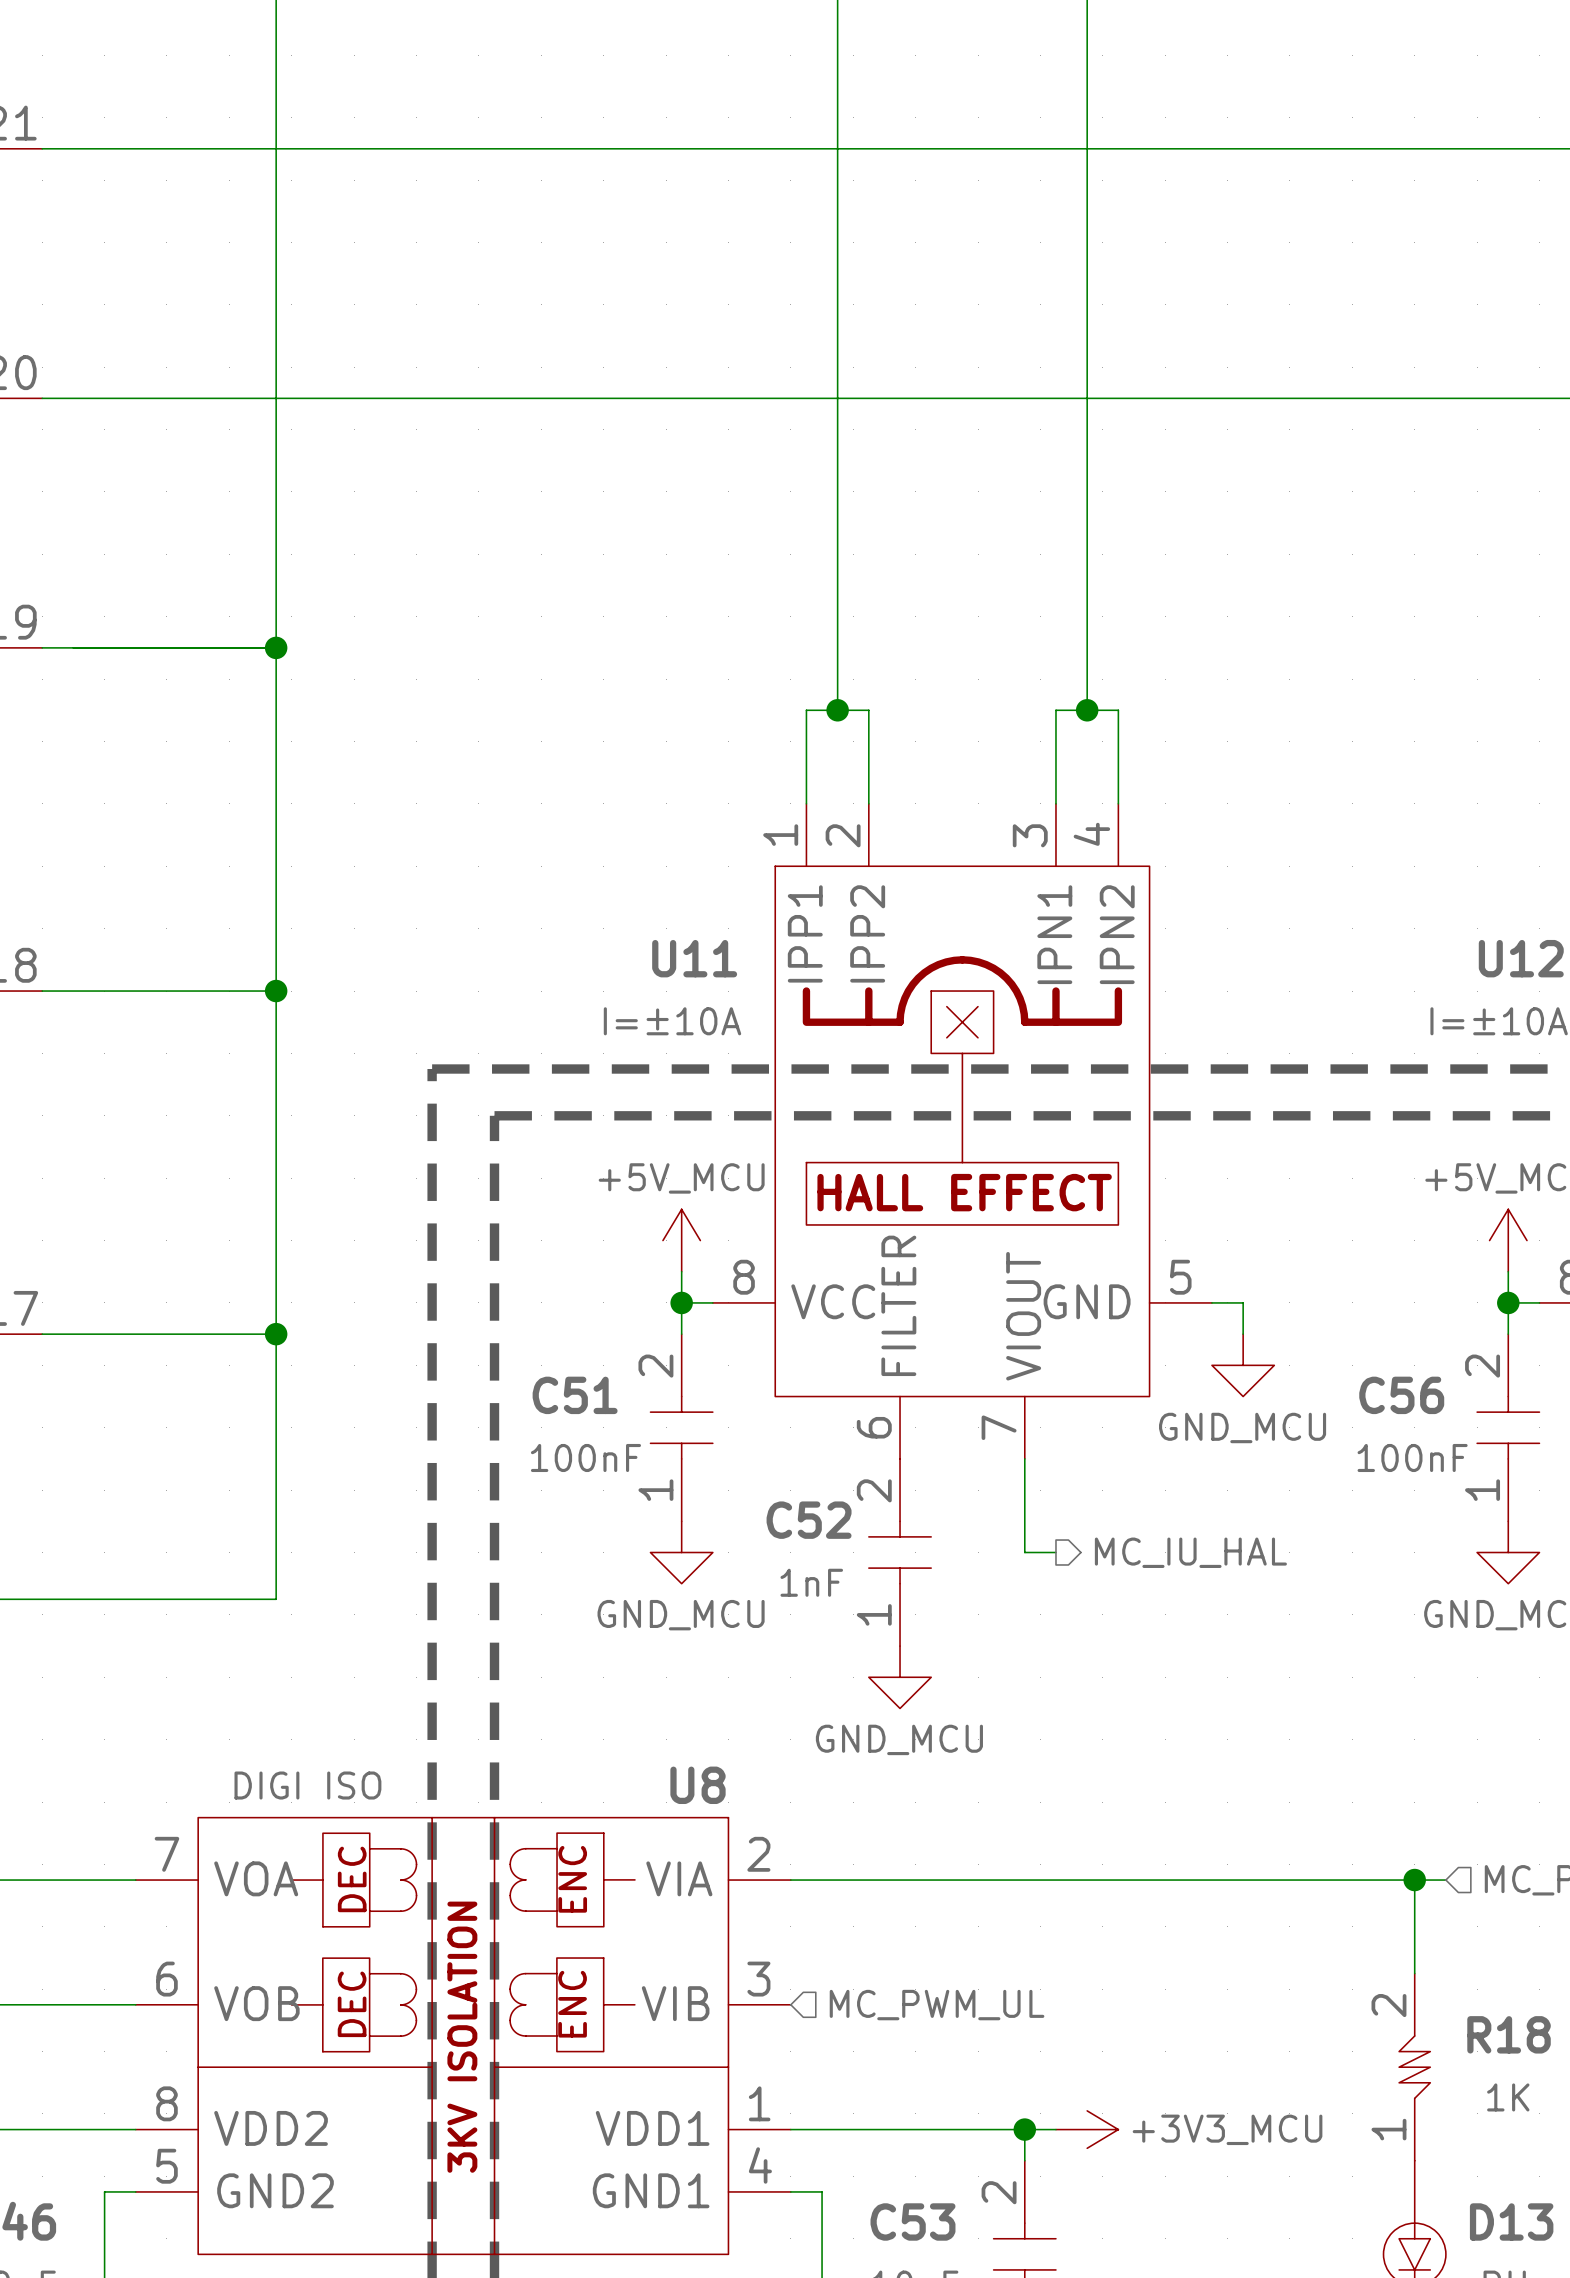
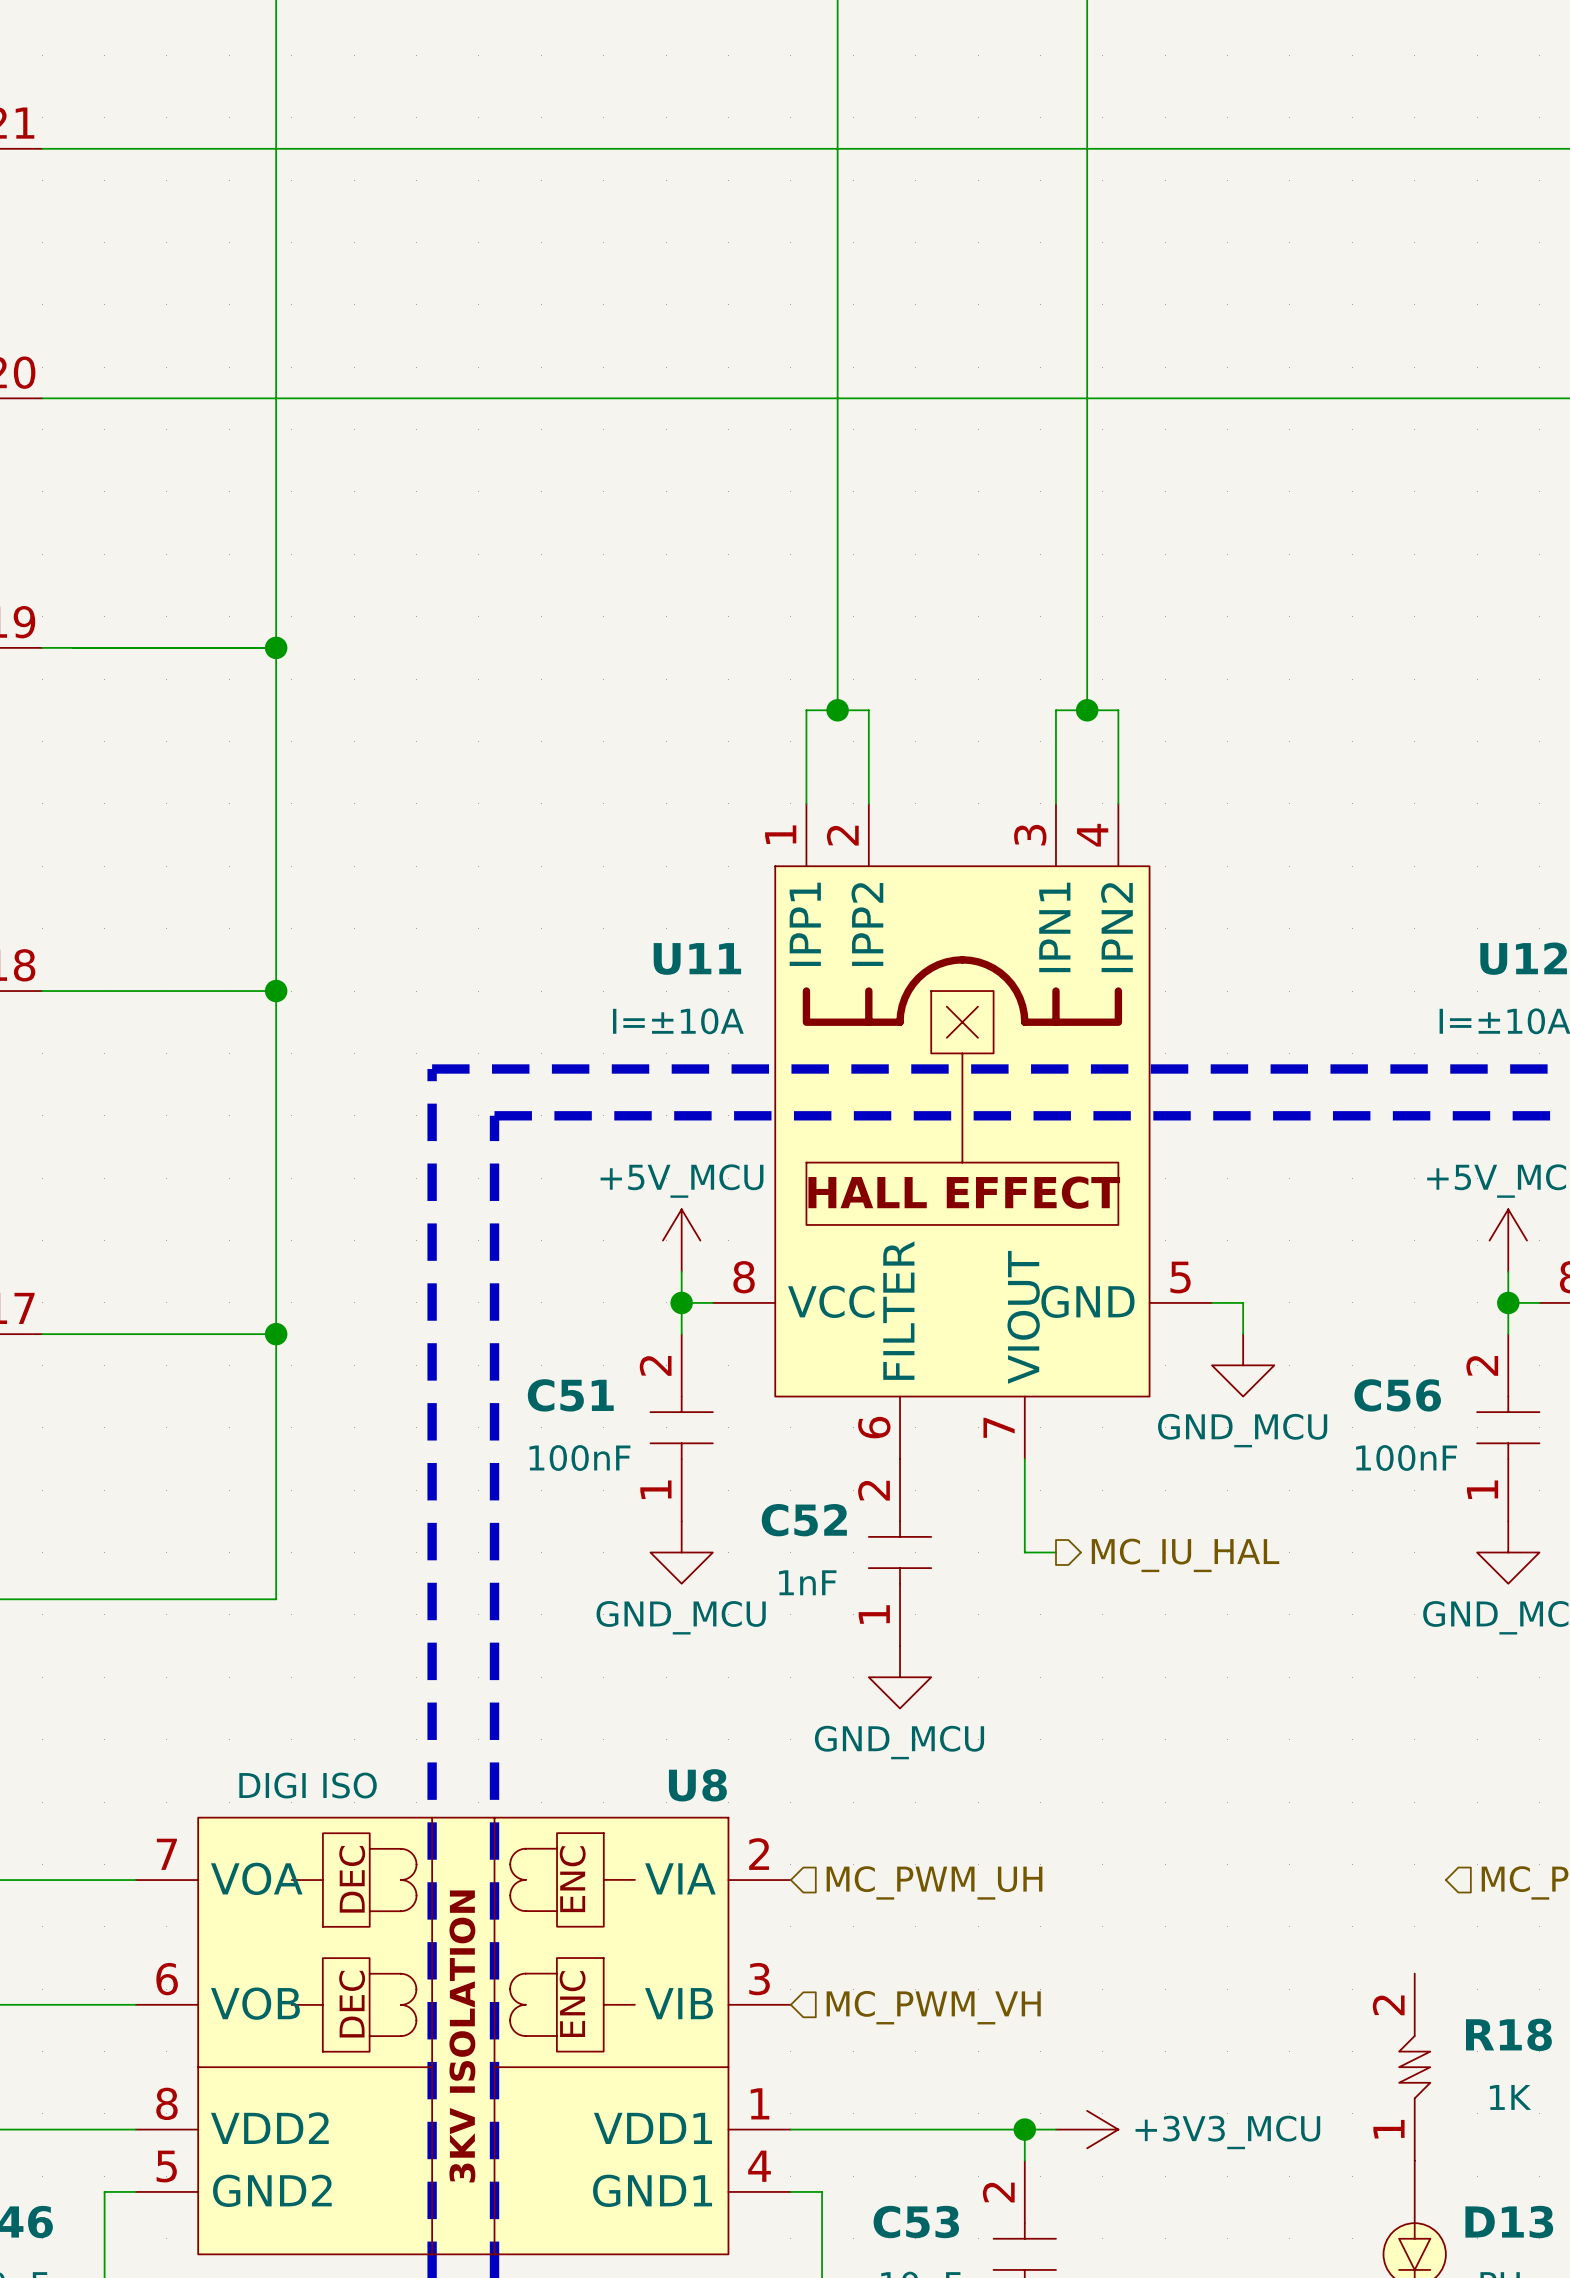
wire: (790, 1880) (1445, 1880) -> none
hierarchical label: none -> MC_PWM_UH (934, 1882)
wire: (1414, 1880) (1414, 1973) -> none
junction: (1414, 1880) -> none
hierarchical label: MC_PWM_UL (937, 2005) -> MC_PWM_VH (933, 2007)

